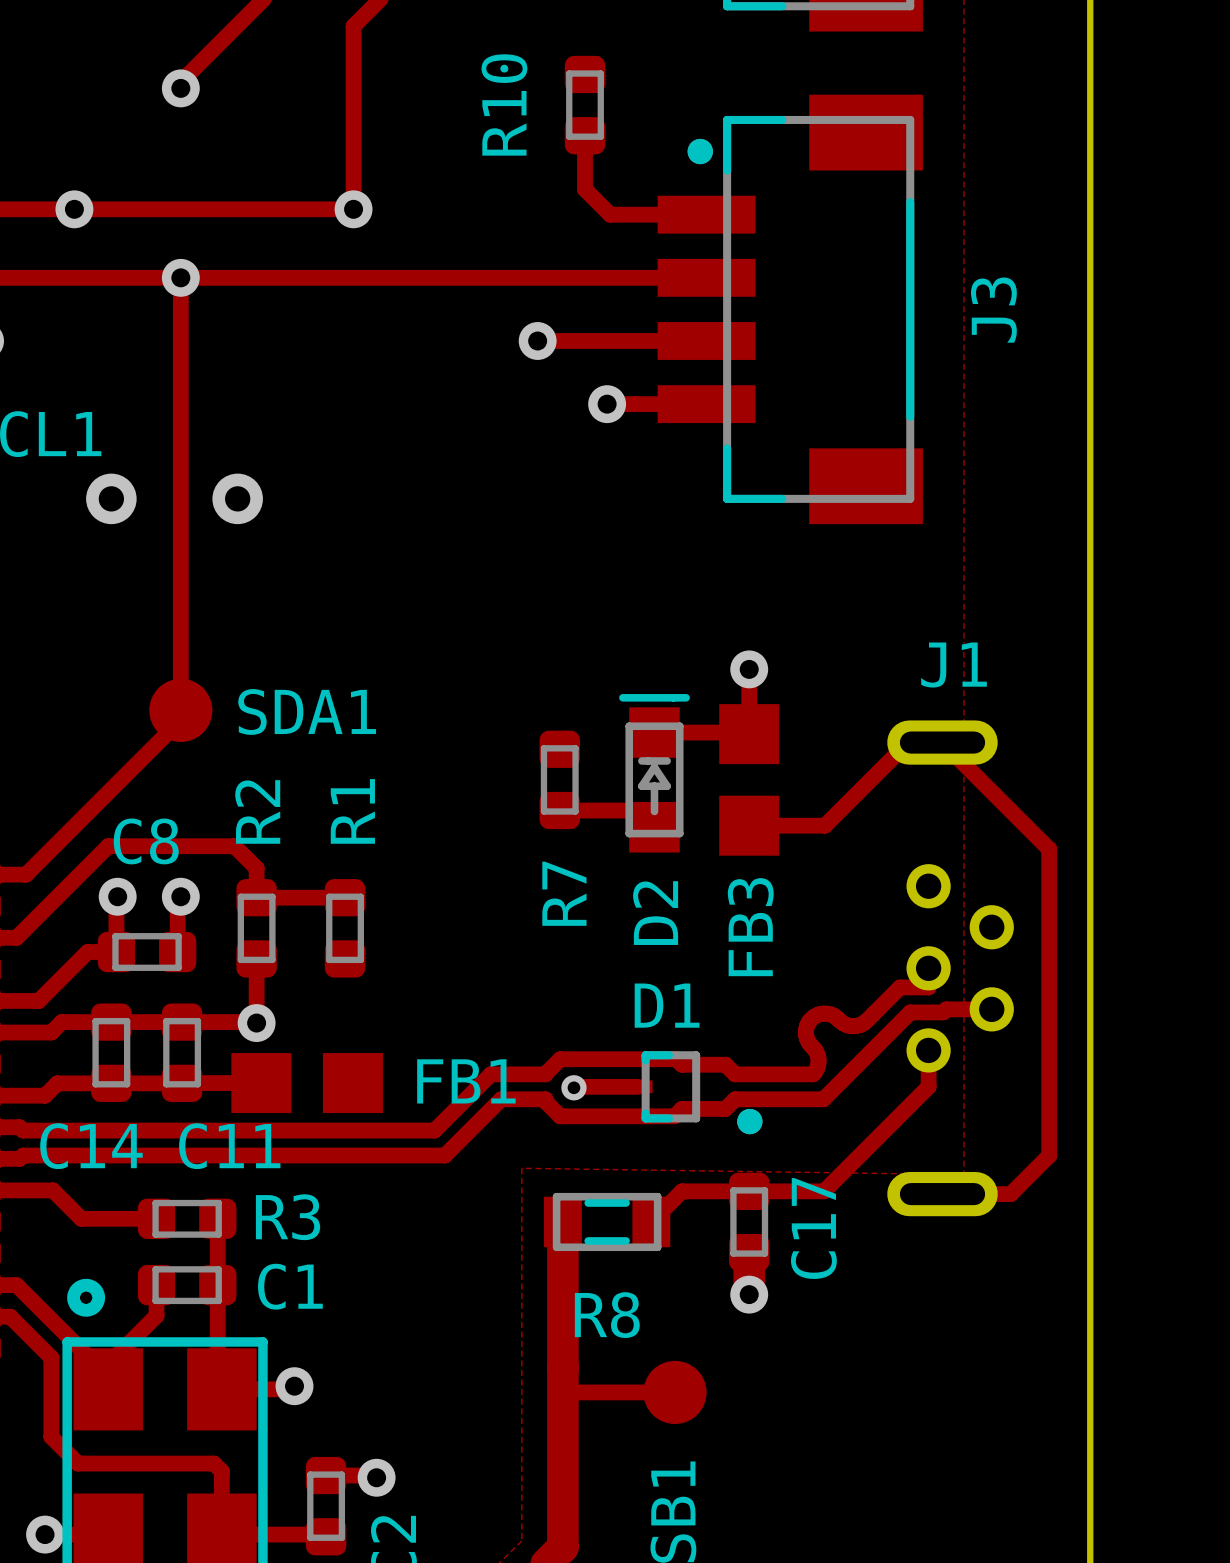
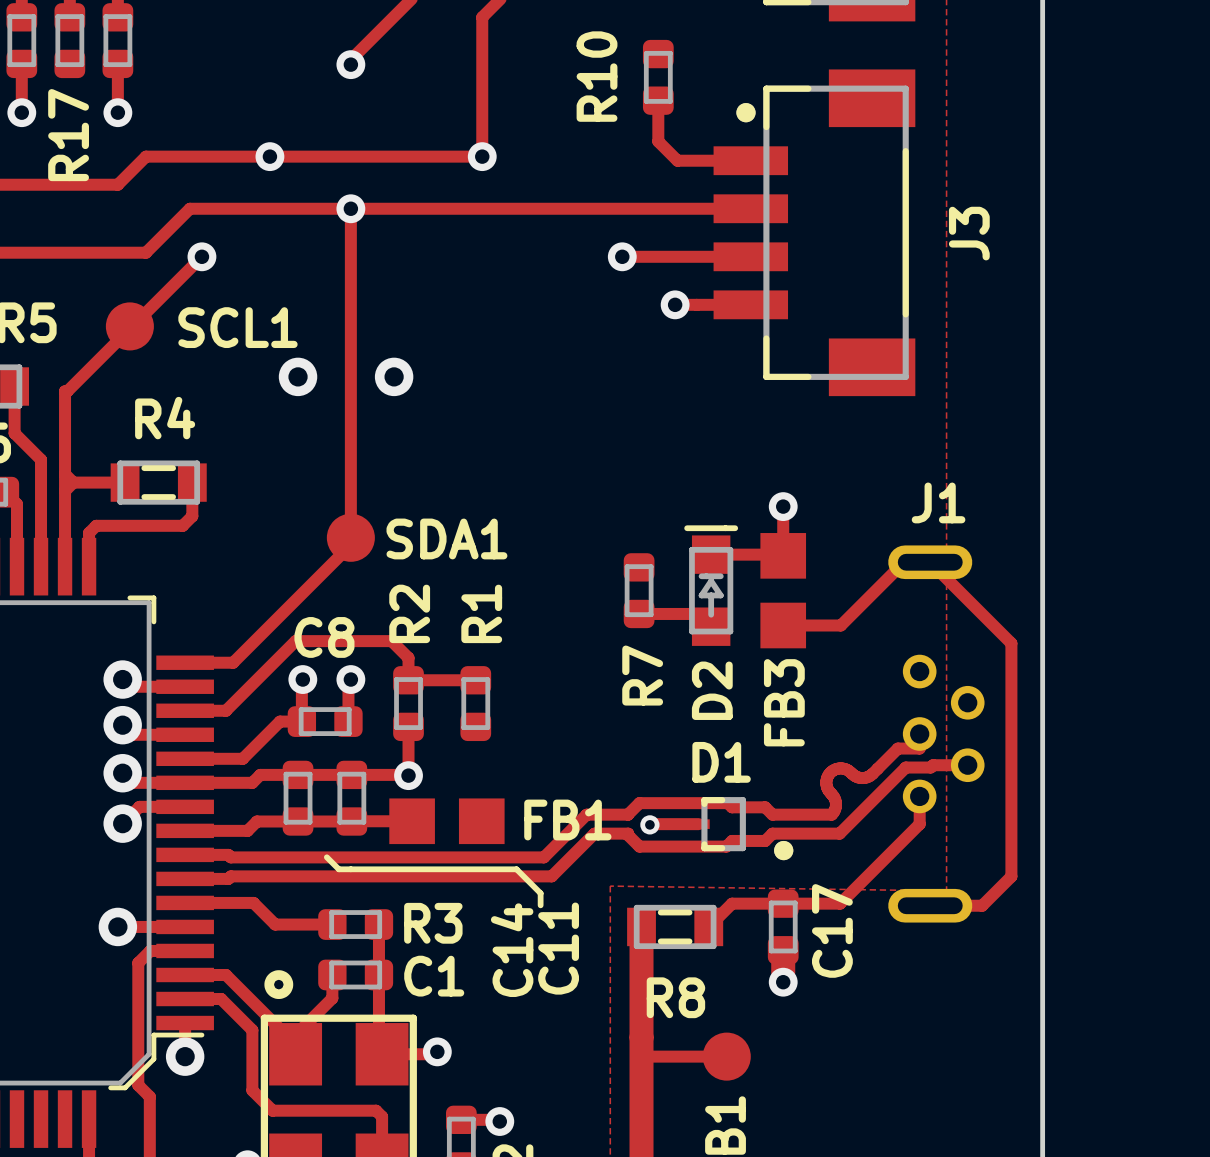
line: none -> (326, 857) (338, 869) (516, 869) (540, 893) (540, 905)
C14 name rotation: 0° (91, 1146) -> 90° counterclockwise (512, 950)
C14 name position: C14 (91, 1146) -> C14 (512, 950)
C11 name rotation: 0° (229, 1146) -> 90° counterclockwise (558, 948)
C11 name position: C11 (229, 1146) -> C11 (558, 948)

